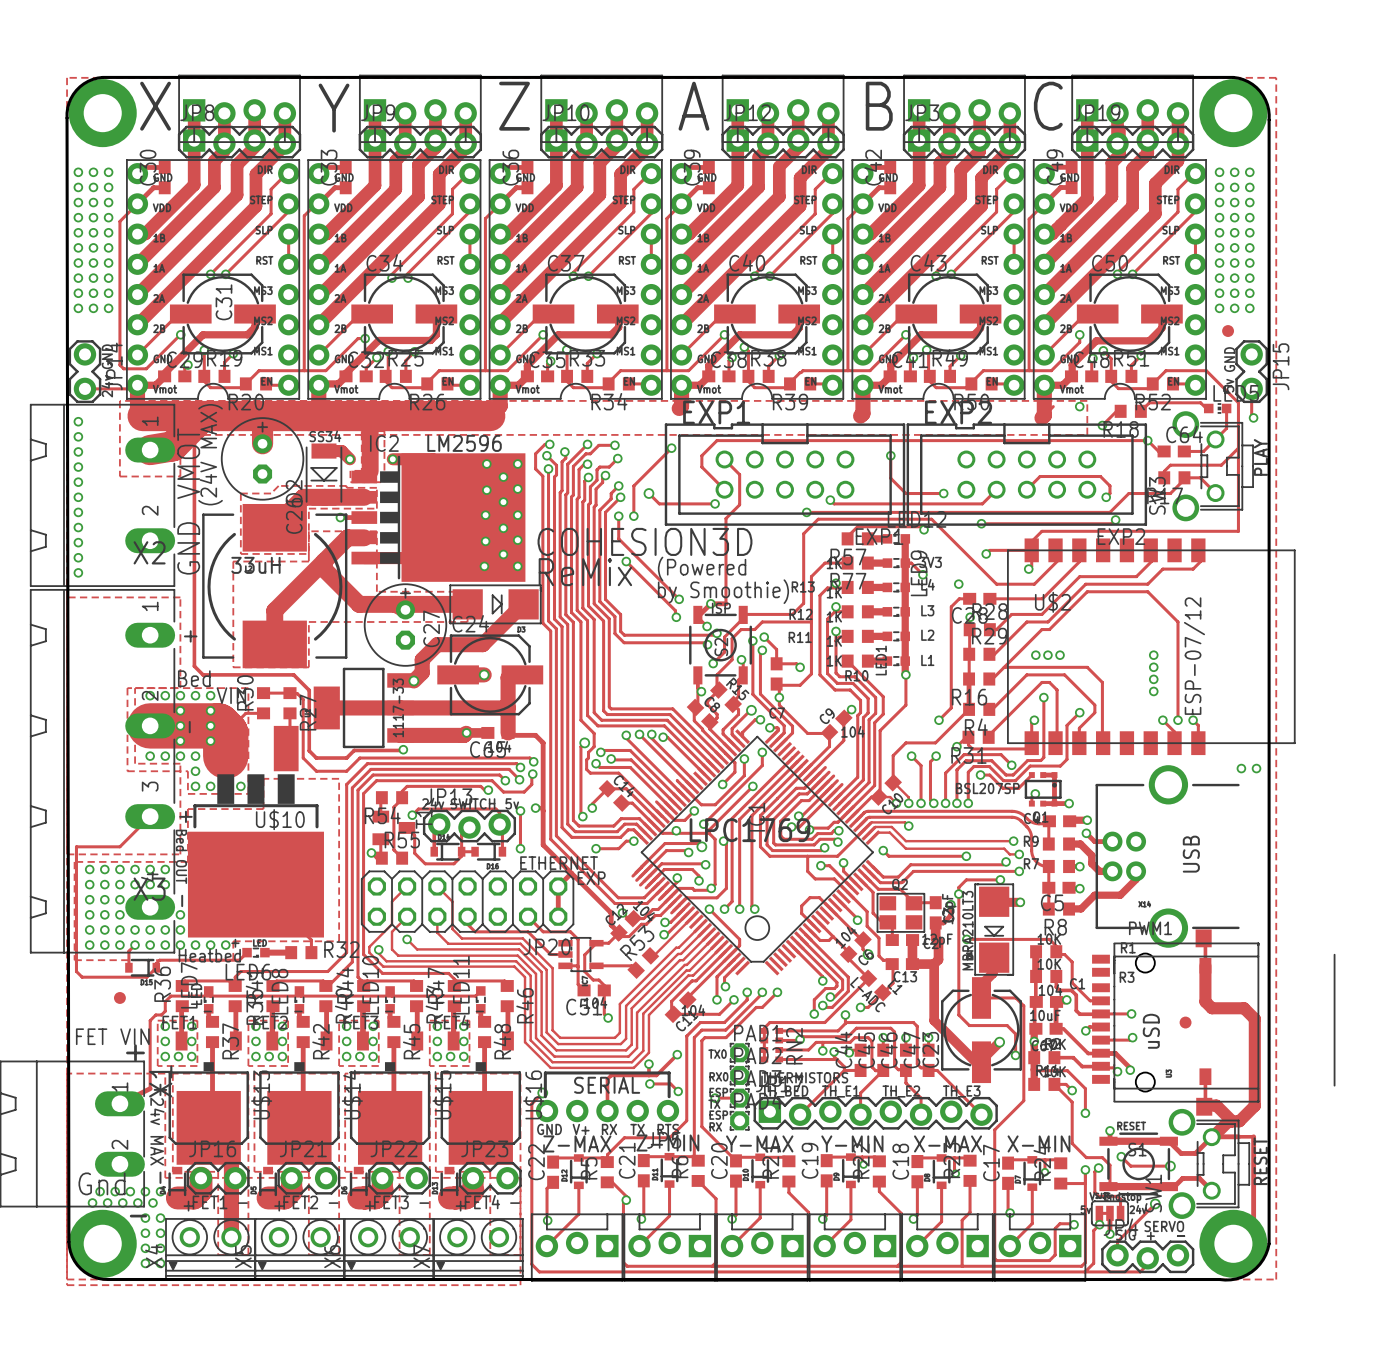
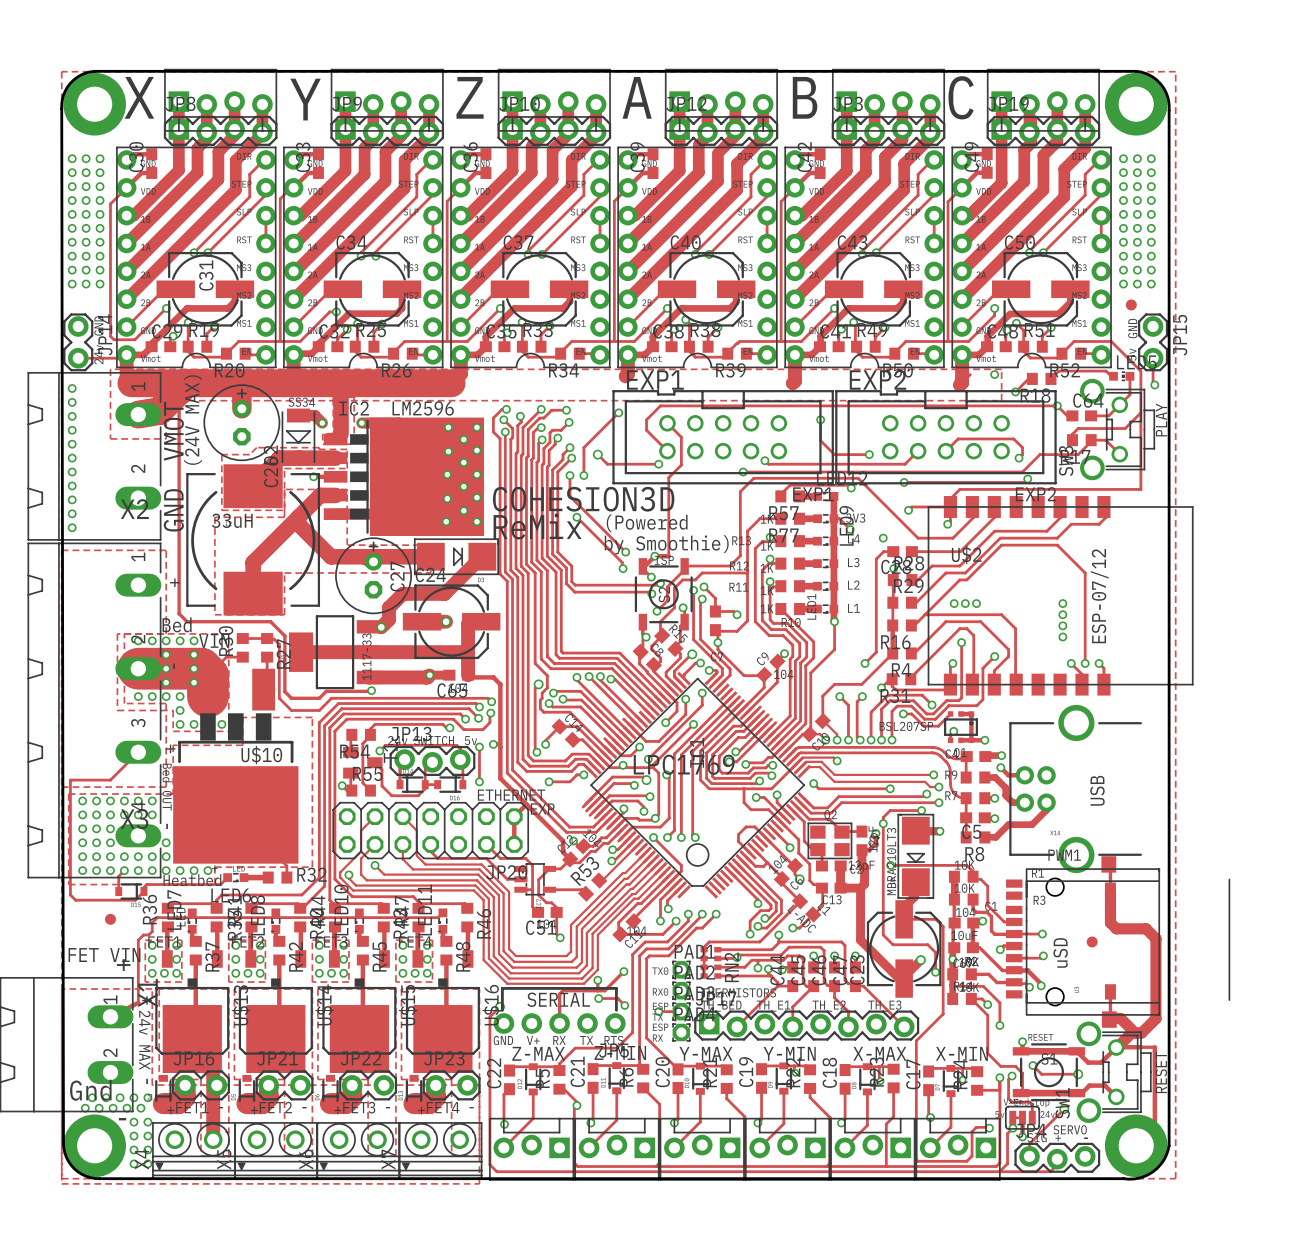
via: (1241, 768) -> none
via: (1256, 768) -> none

